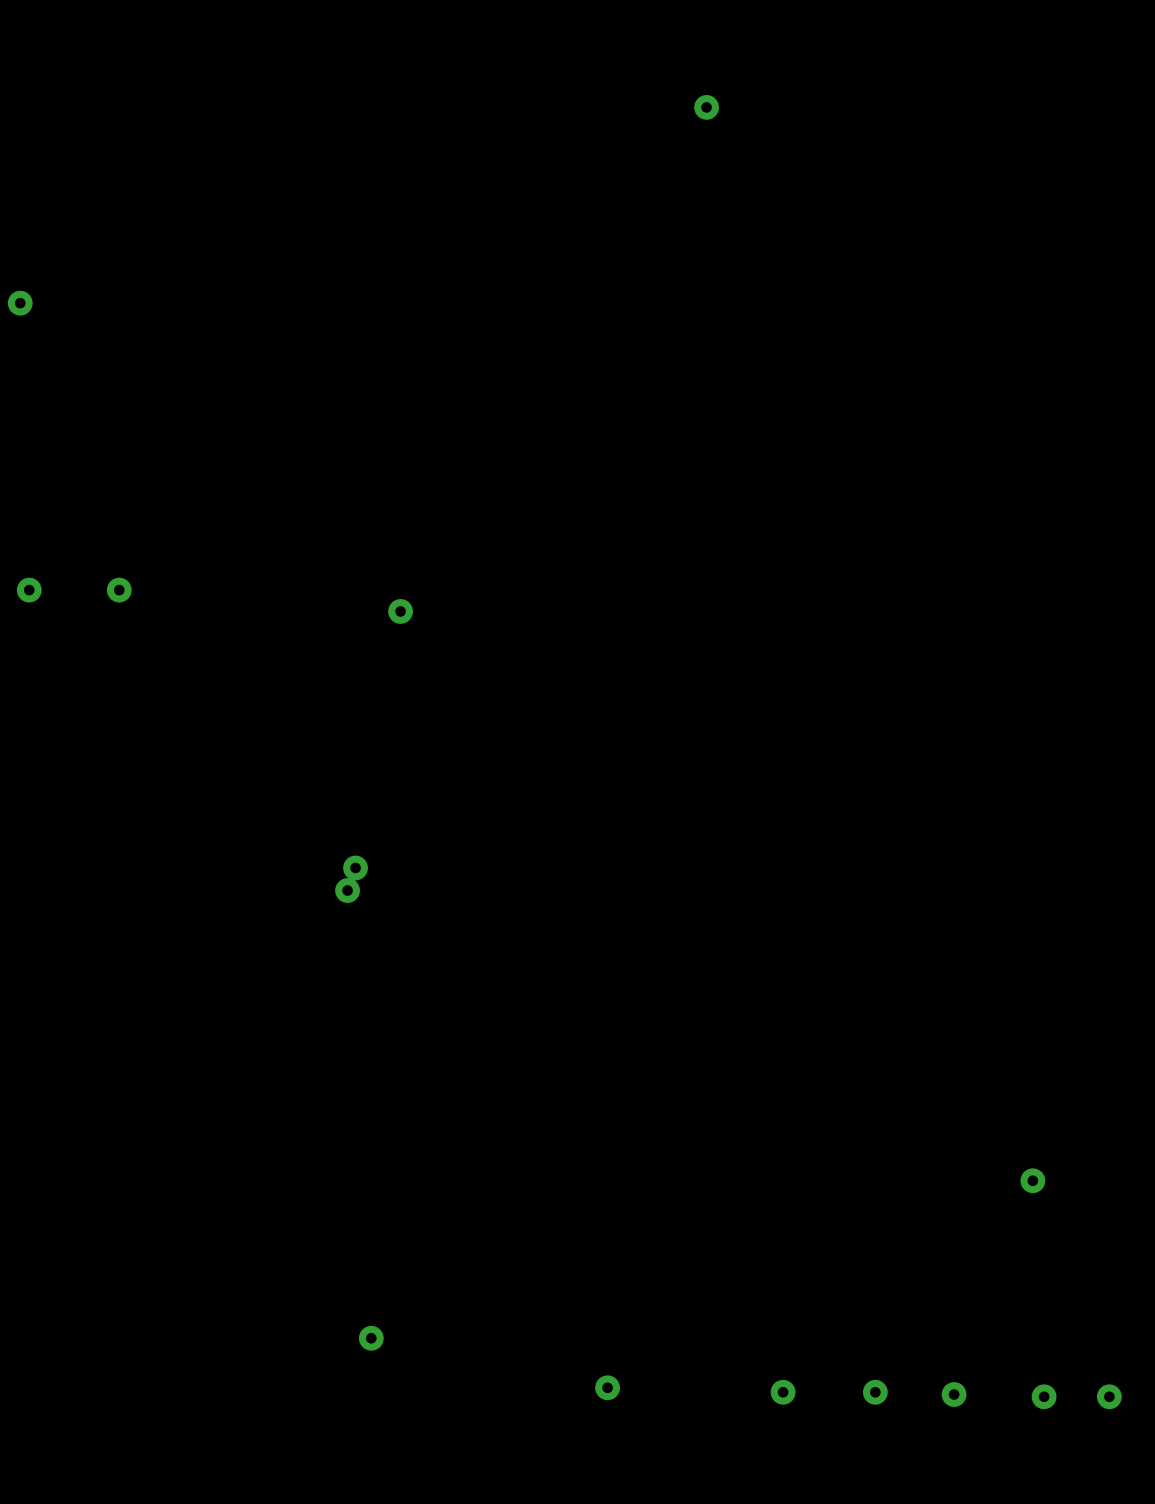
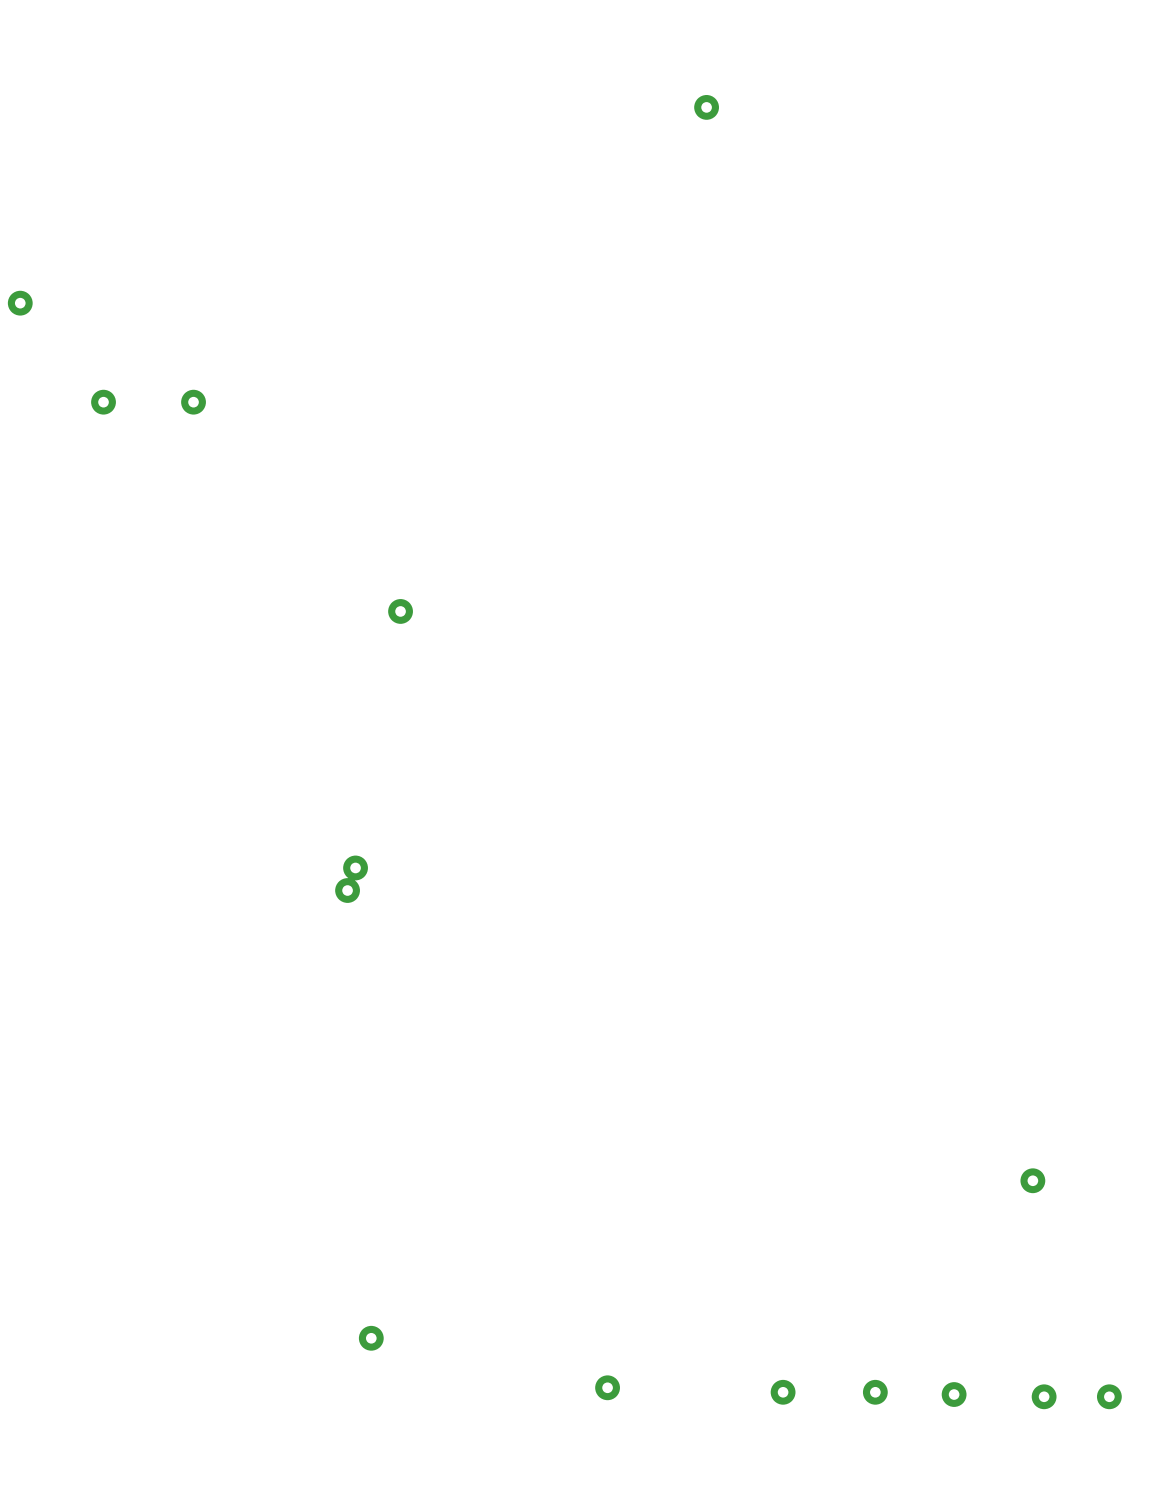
via: none -> (103, 402)
via: none -> (193, 402)
via: (29, 590) -> none
via: (119, 590) -> none

